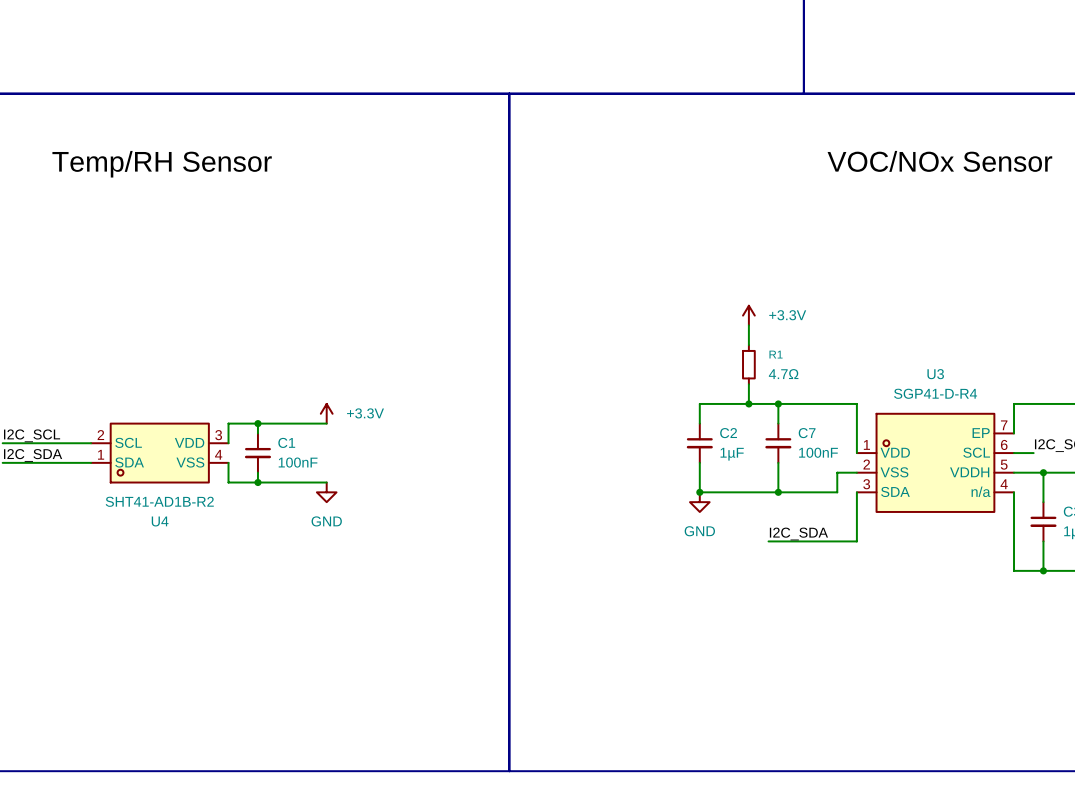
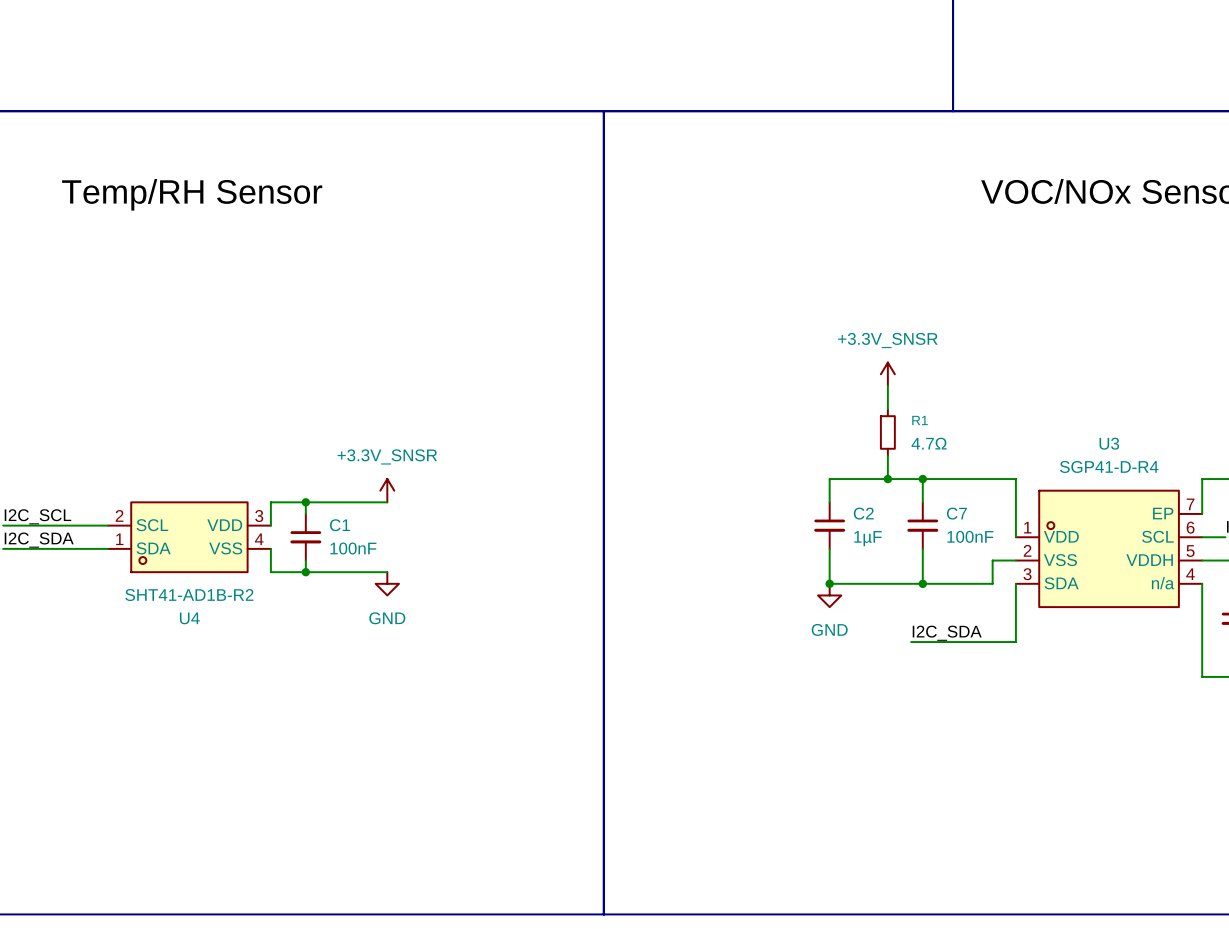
power symbol: +3.3V (748, 315) -> +3.3V_SNSR (887, 374)
power symbol: +3.3V (326, 413) -> +3.3V_SNSR (387, 490)

